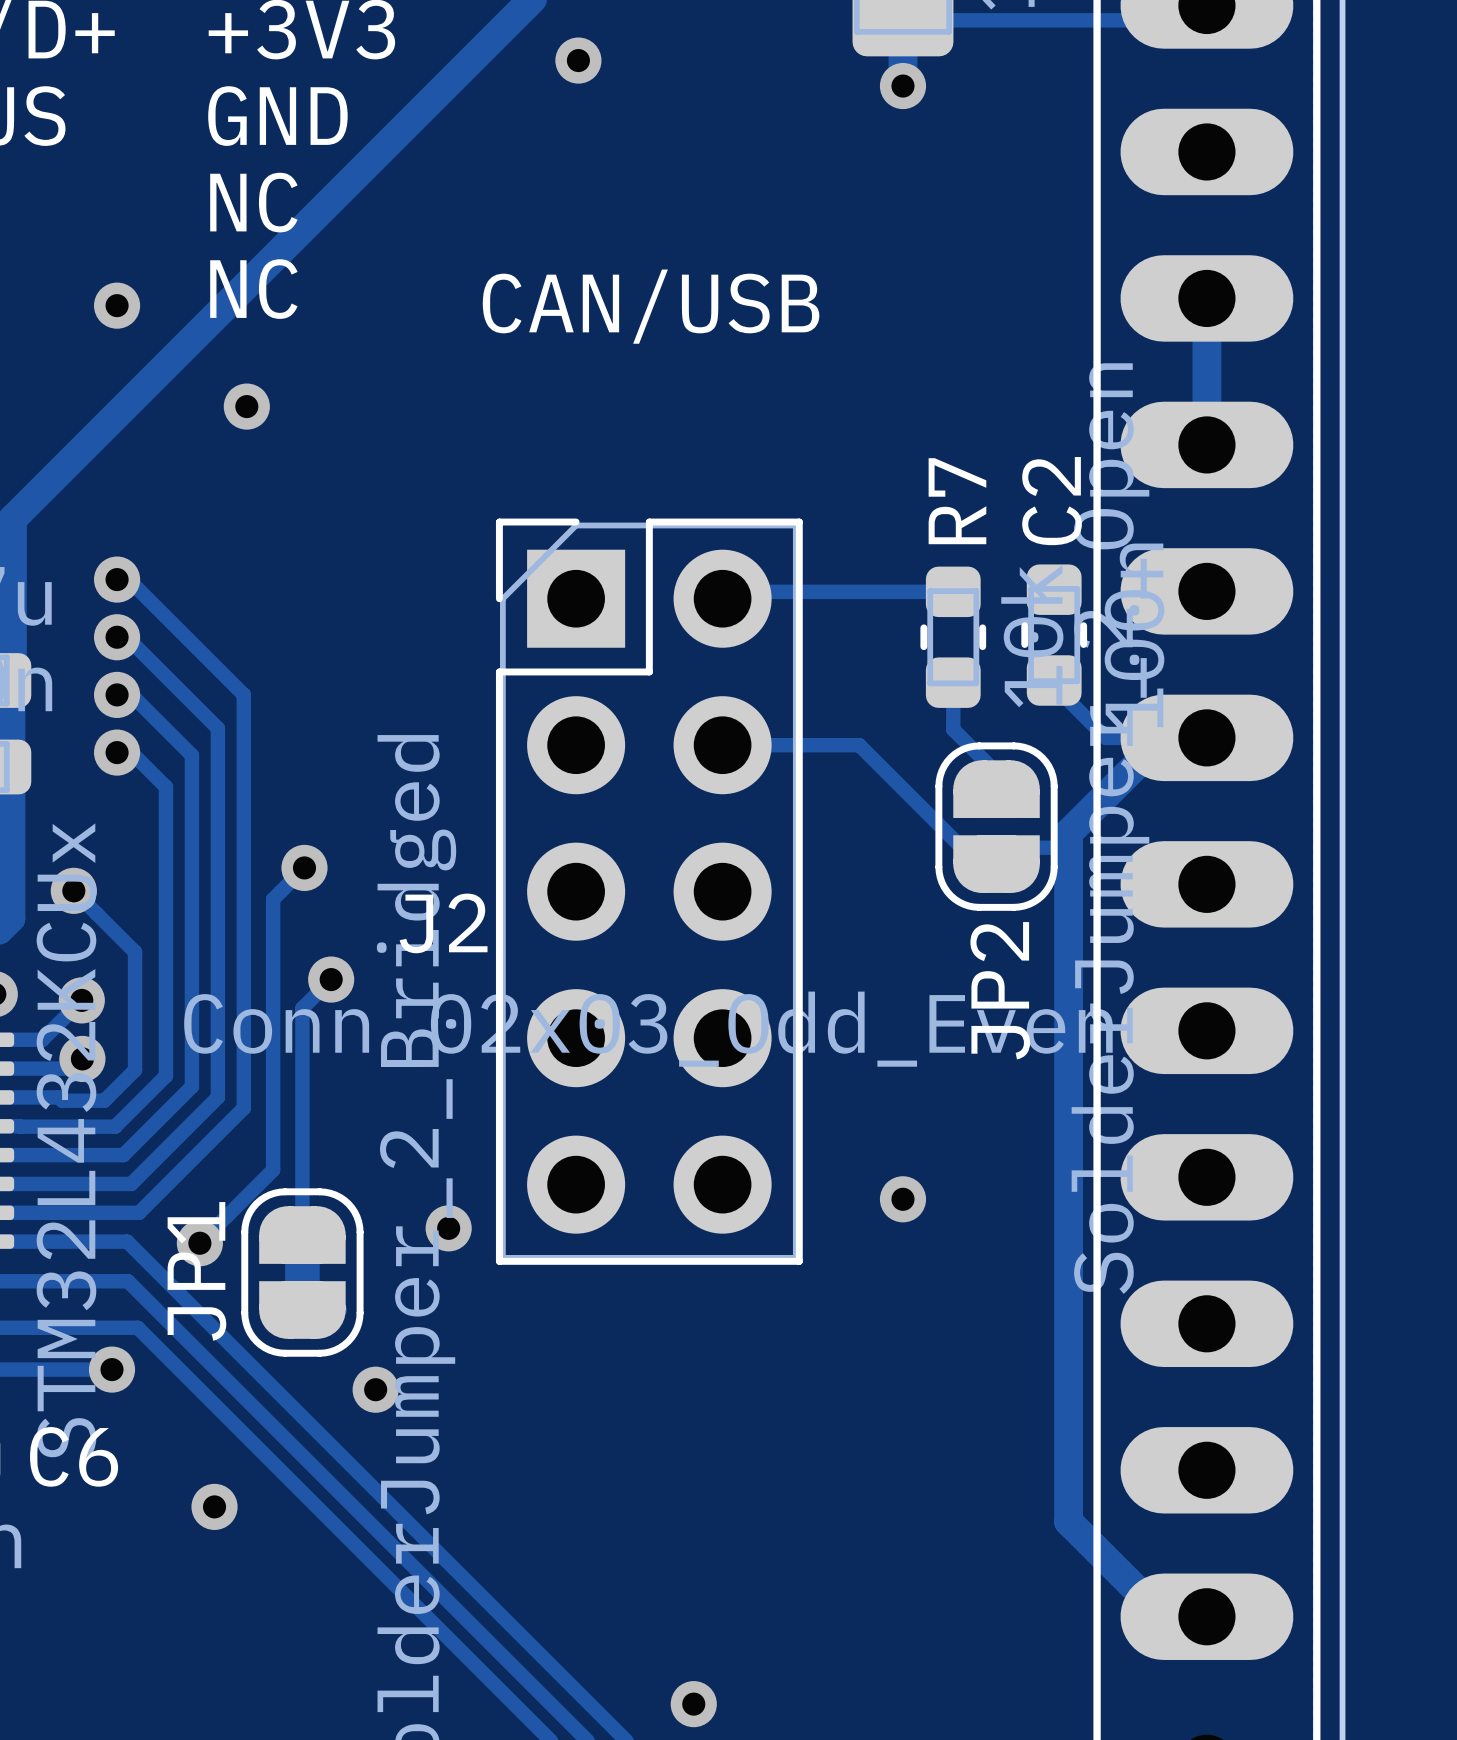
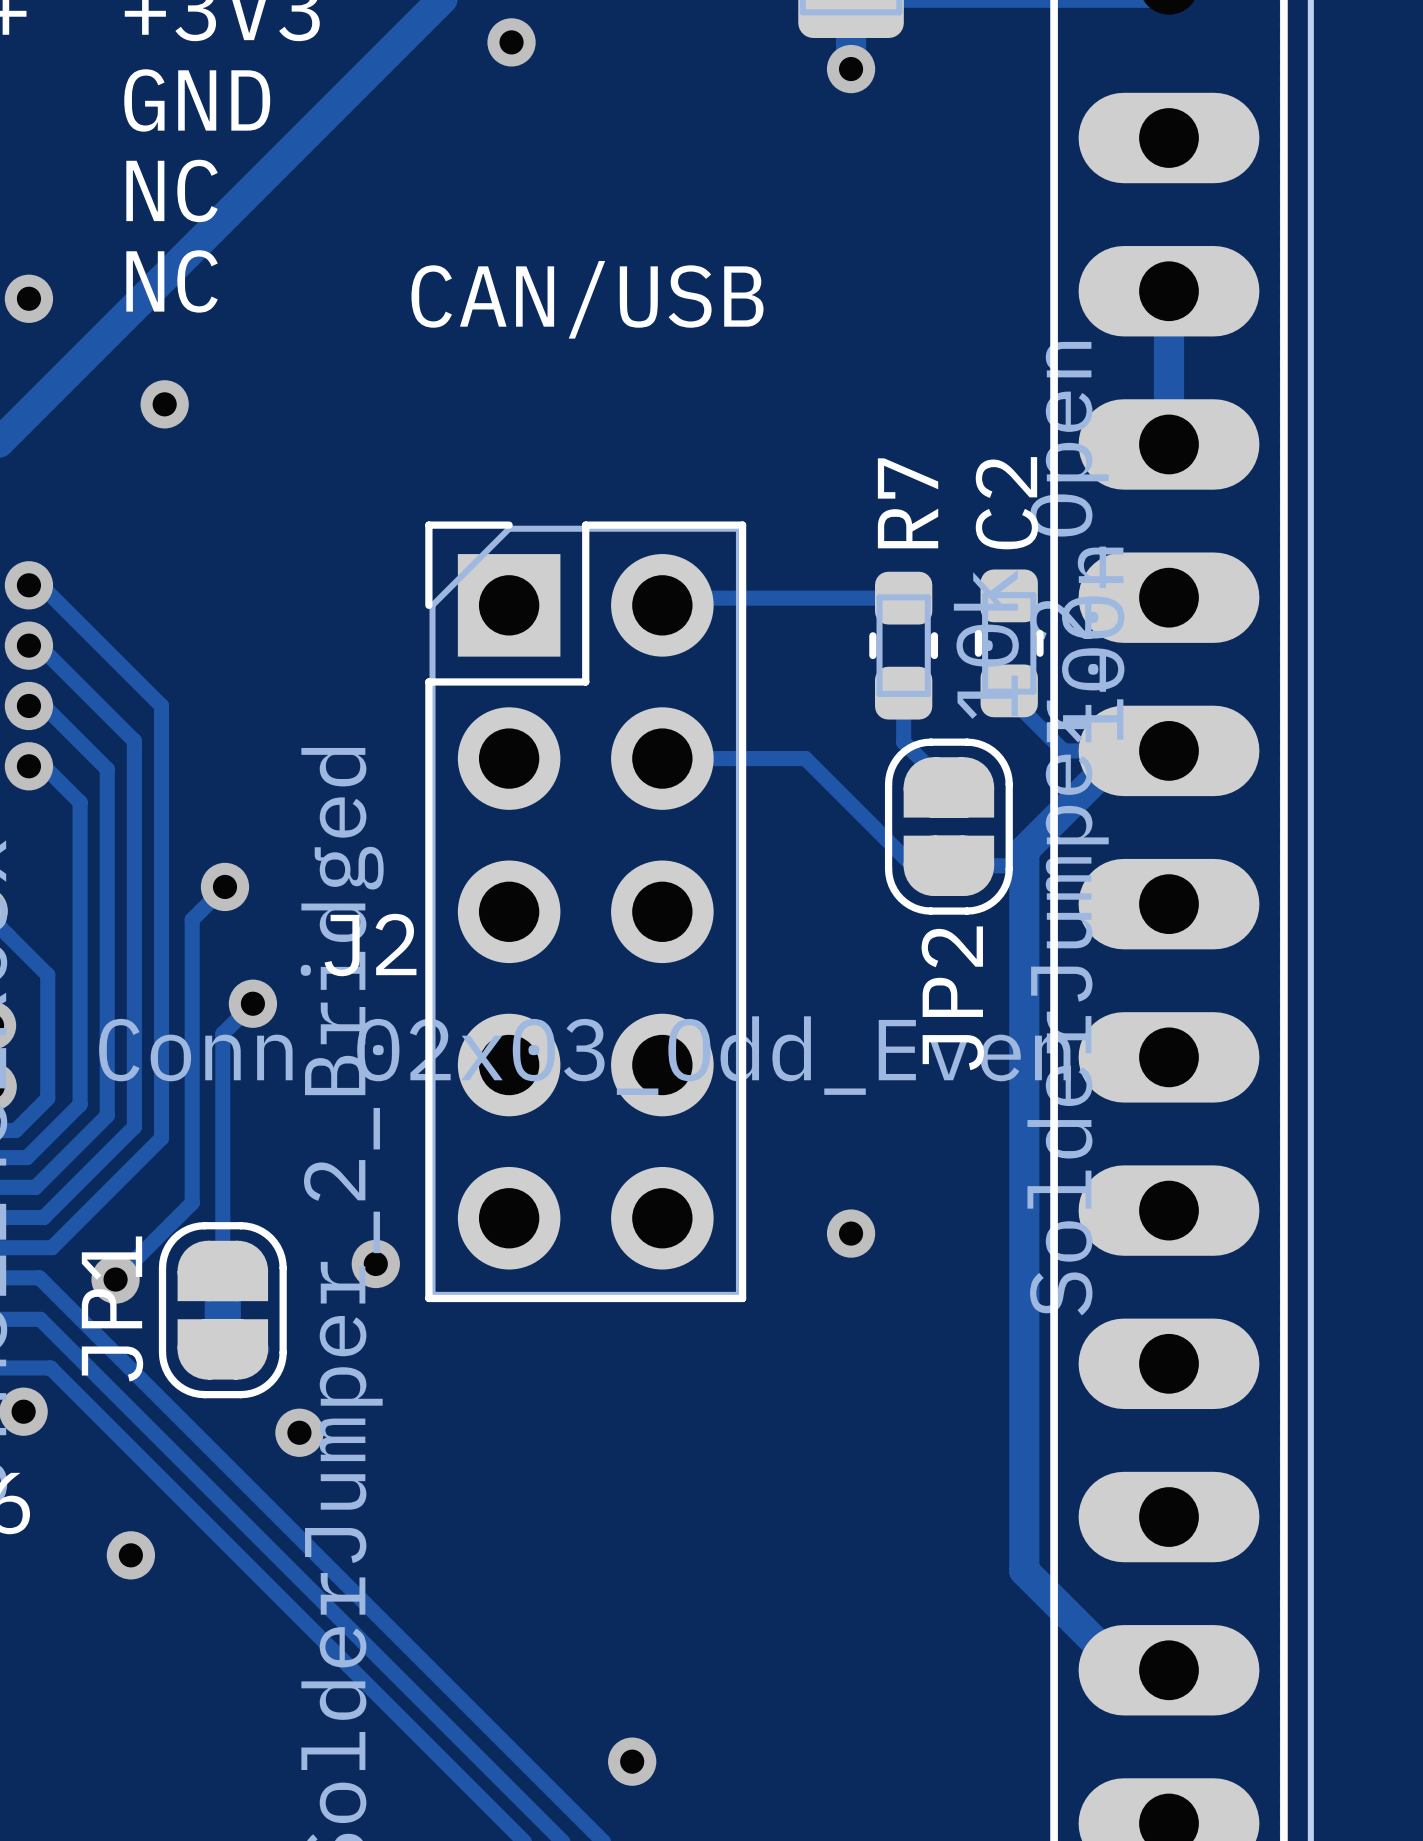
JP2 position: (996, 826) -> (948, 826)

